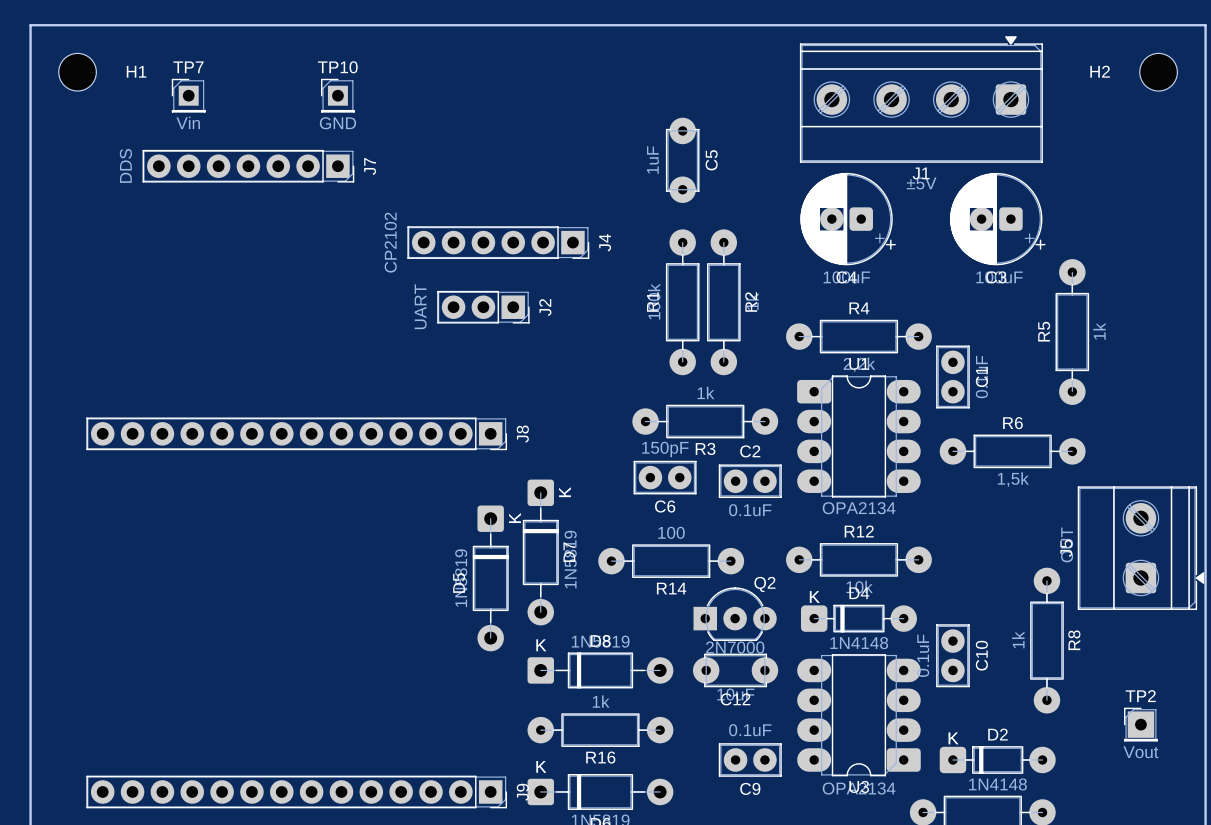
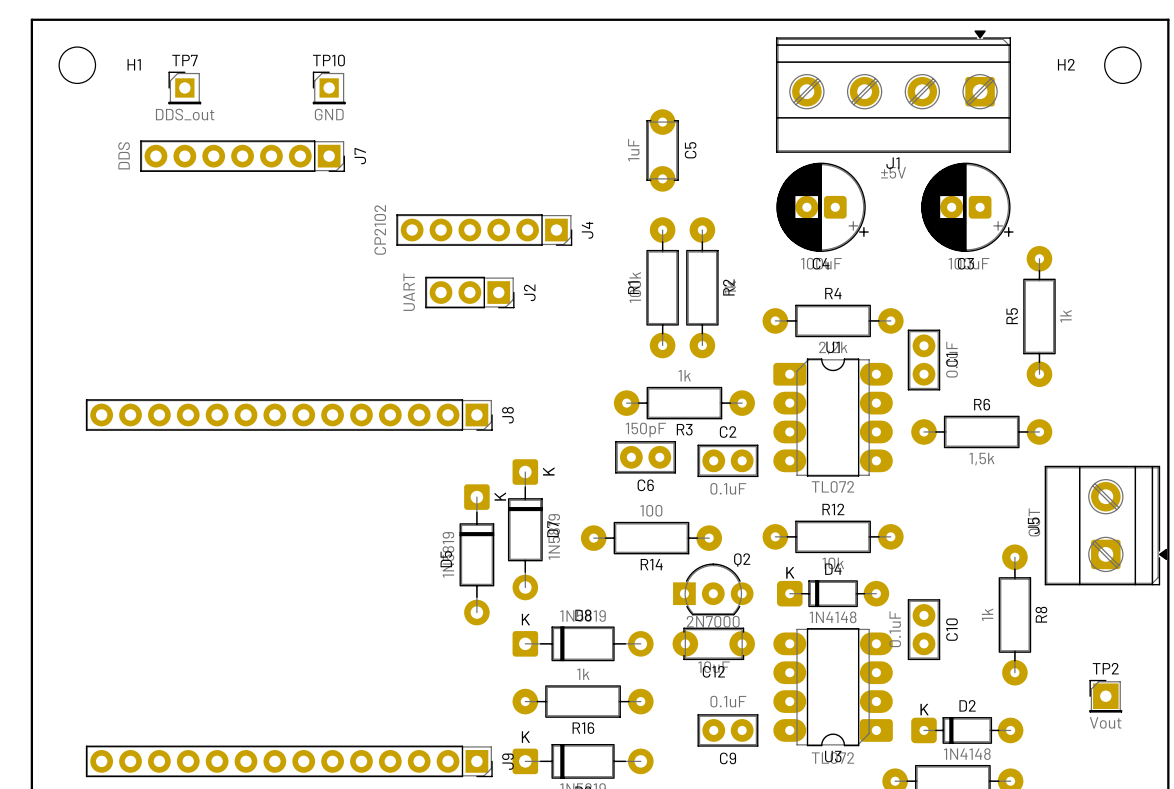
TP7 value: Vin (188, 122) -> DDS_out (185, 114)
U1 value: OPA2134 (859, 508) -> TL072 (832, 486)
U3 value: OPA2134 (859, 788) -> TL072 (832, 758)

